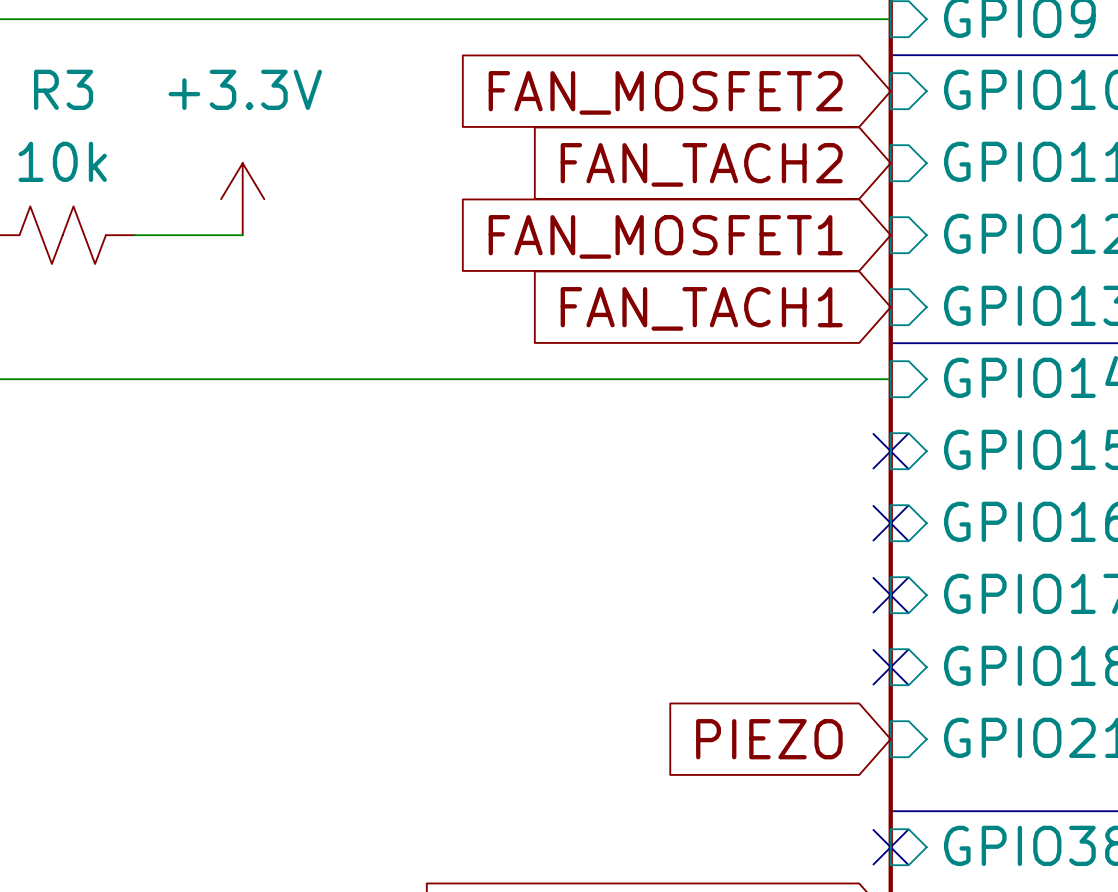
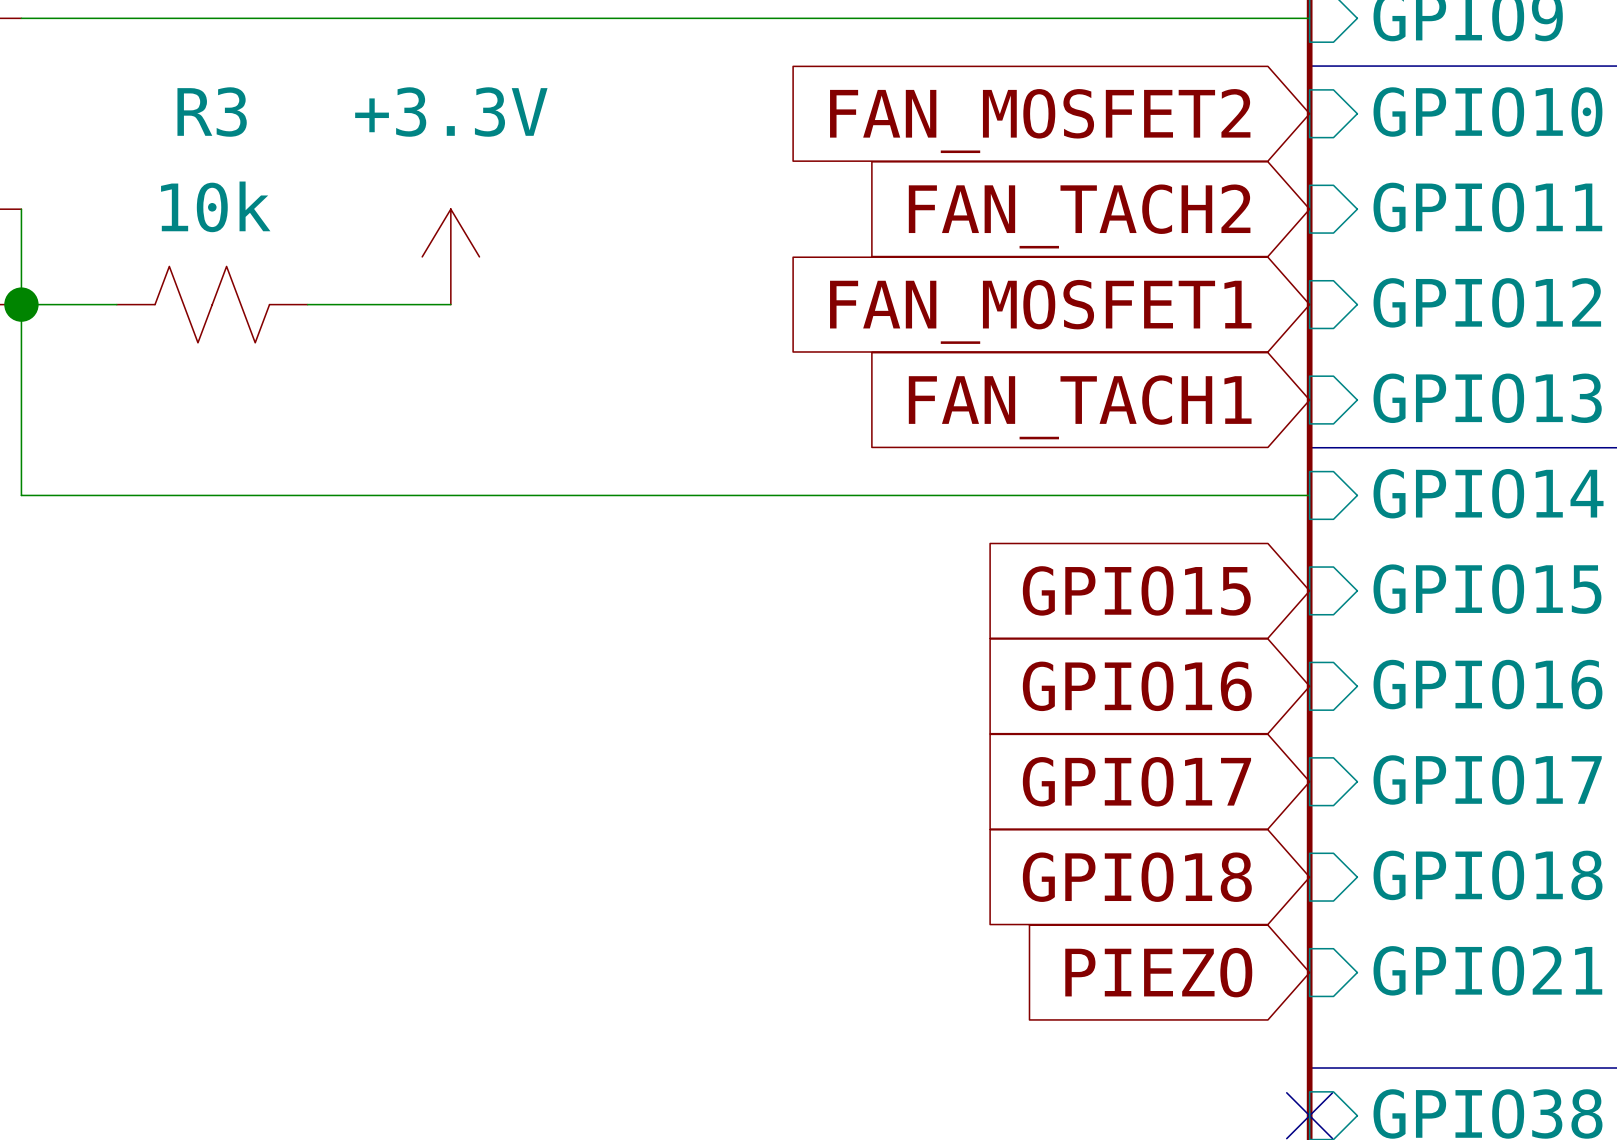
global label: none -> GPIO15 (1136, 590)
no-connect mark: (890, 451) -> none
global label: none -> GPIO16 (1137, 686)
no-connect mark: (890, 523) -> none
global label: none -> GPIO17 (1136, 781)
no-connect mark: (890, 595) -> none
global label: none -> GPIO18 (1137, 877)
no-connect mark: (890, 667) -> none

